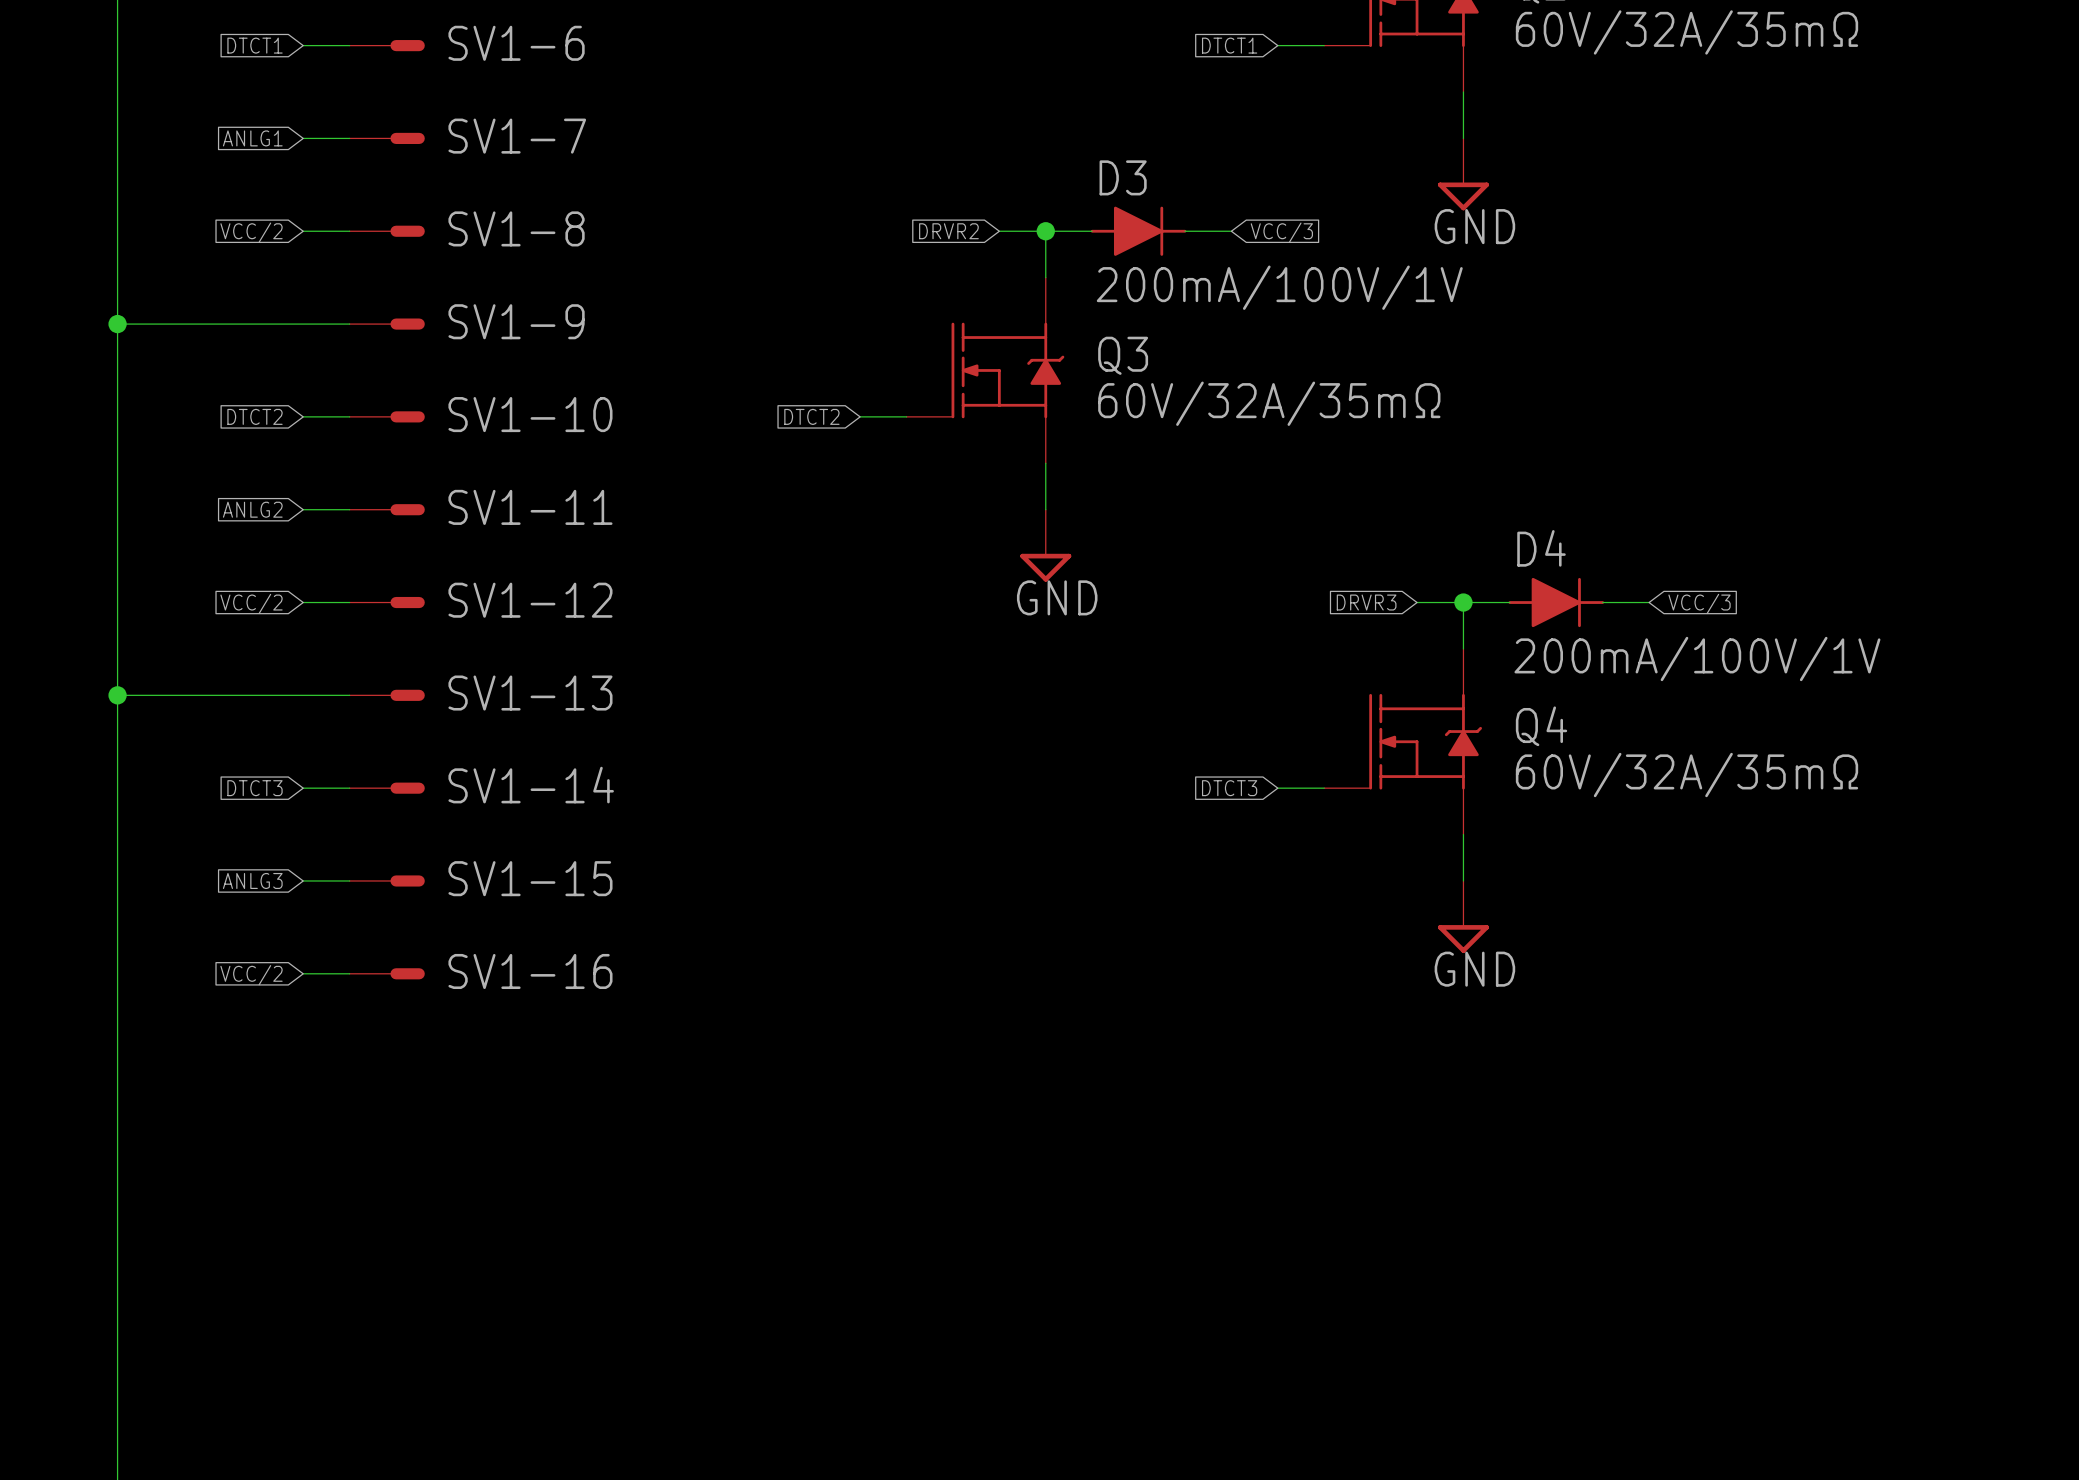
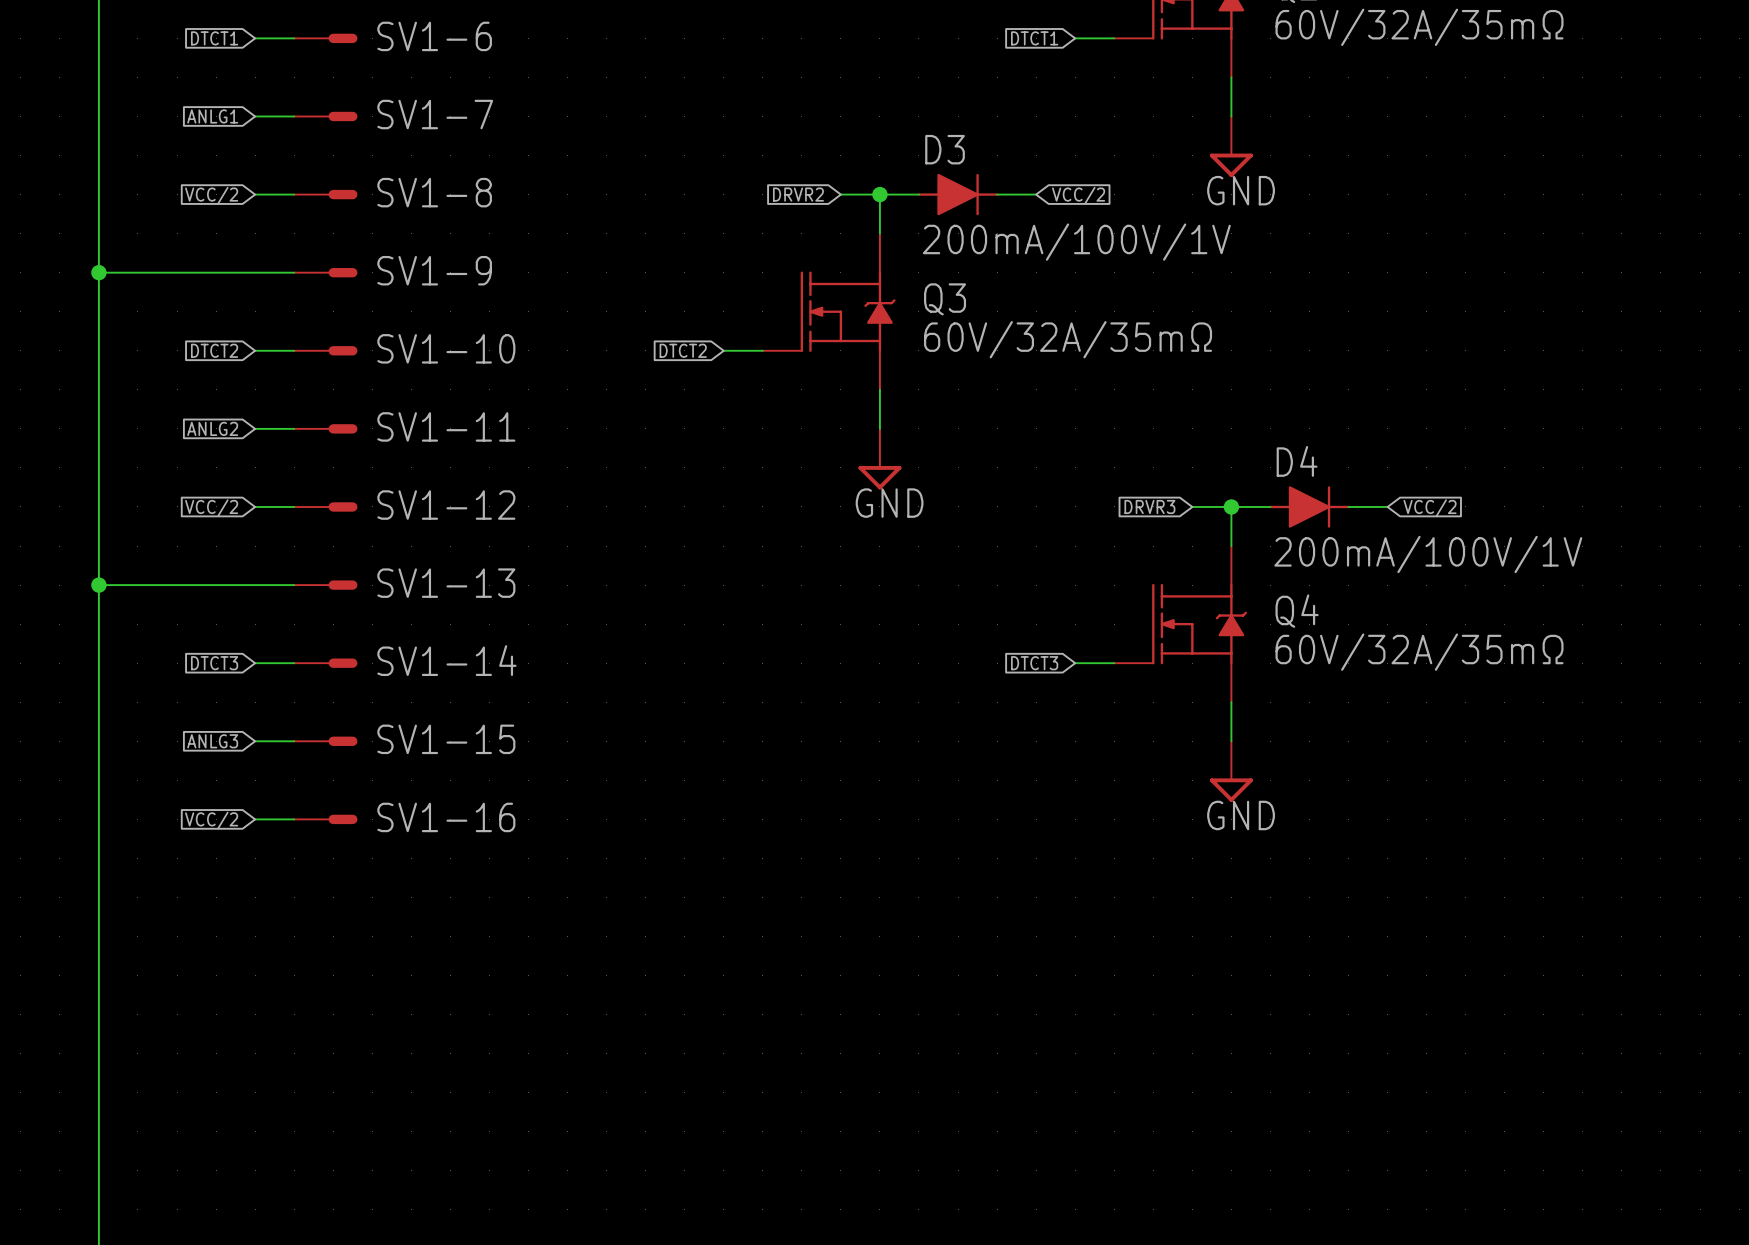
global label: VCC/3 (1281, 232) -> VCC/2 (1078, 195)
global label: VCC/3 (1699, 603) -> VCC/2 (1430, 508)

